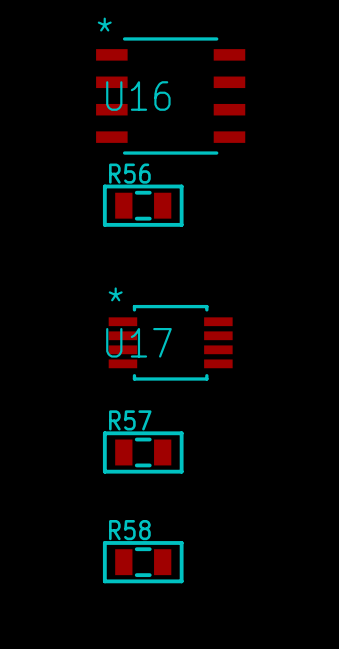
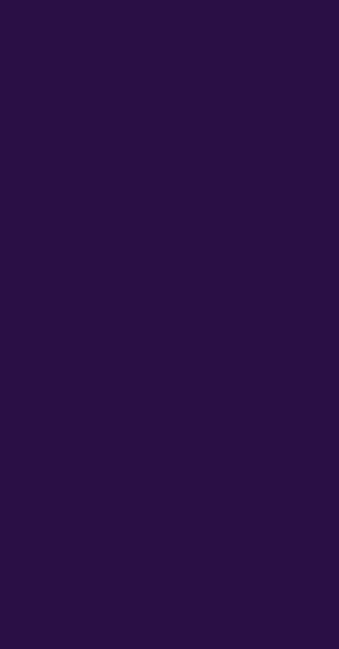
U16: (170, 96) -> none
R56: (143, 205) -> none
U17: (170, 342) -> none
R57: (143, 452) -> none
R58: (143, 562) -> none

